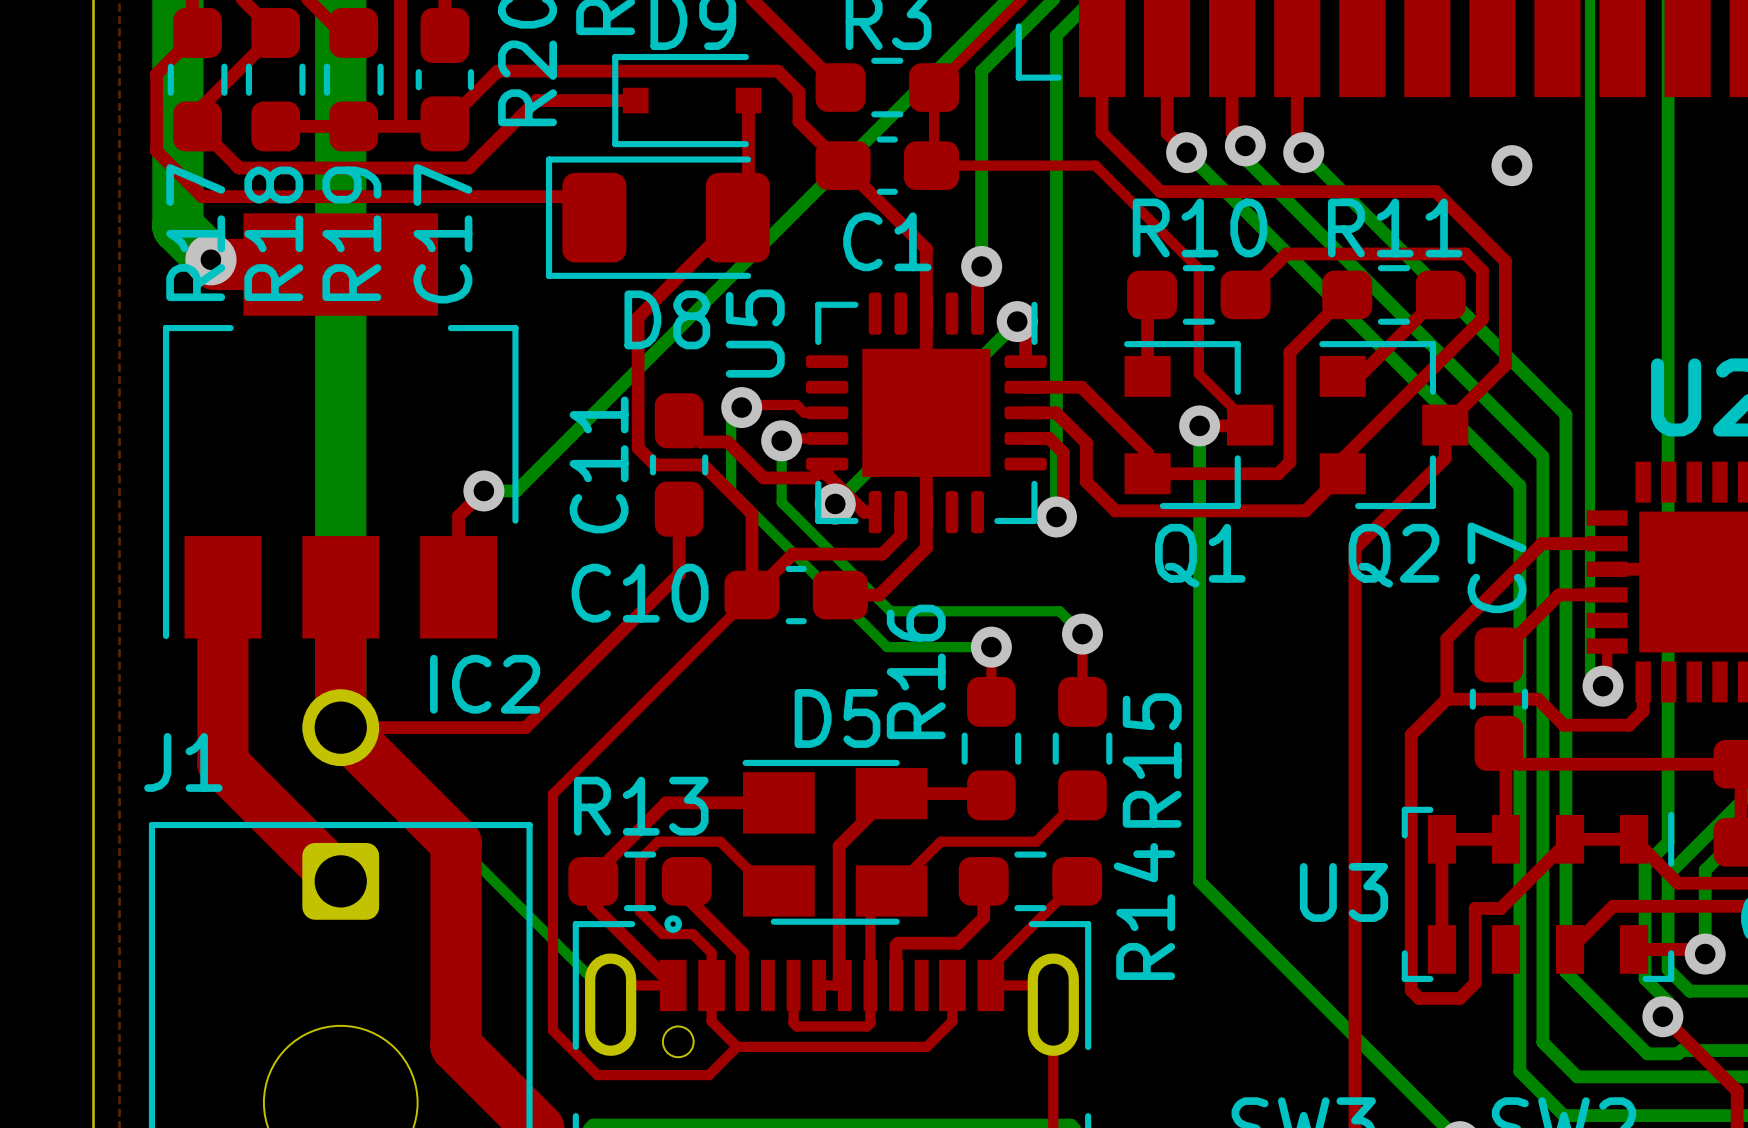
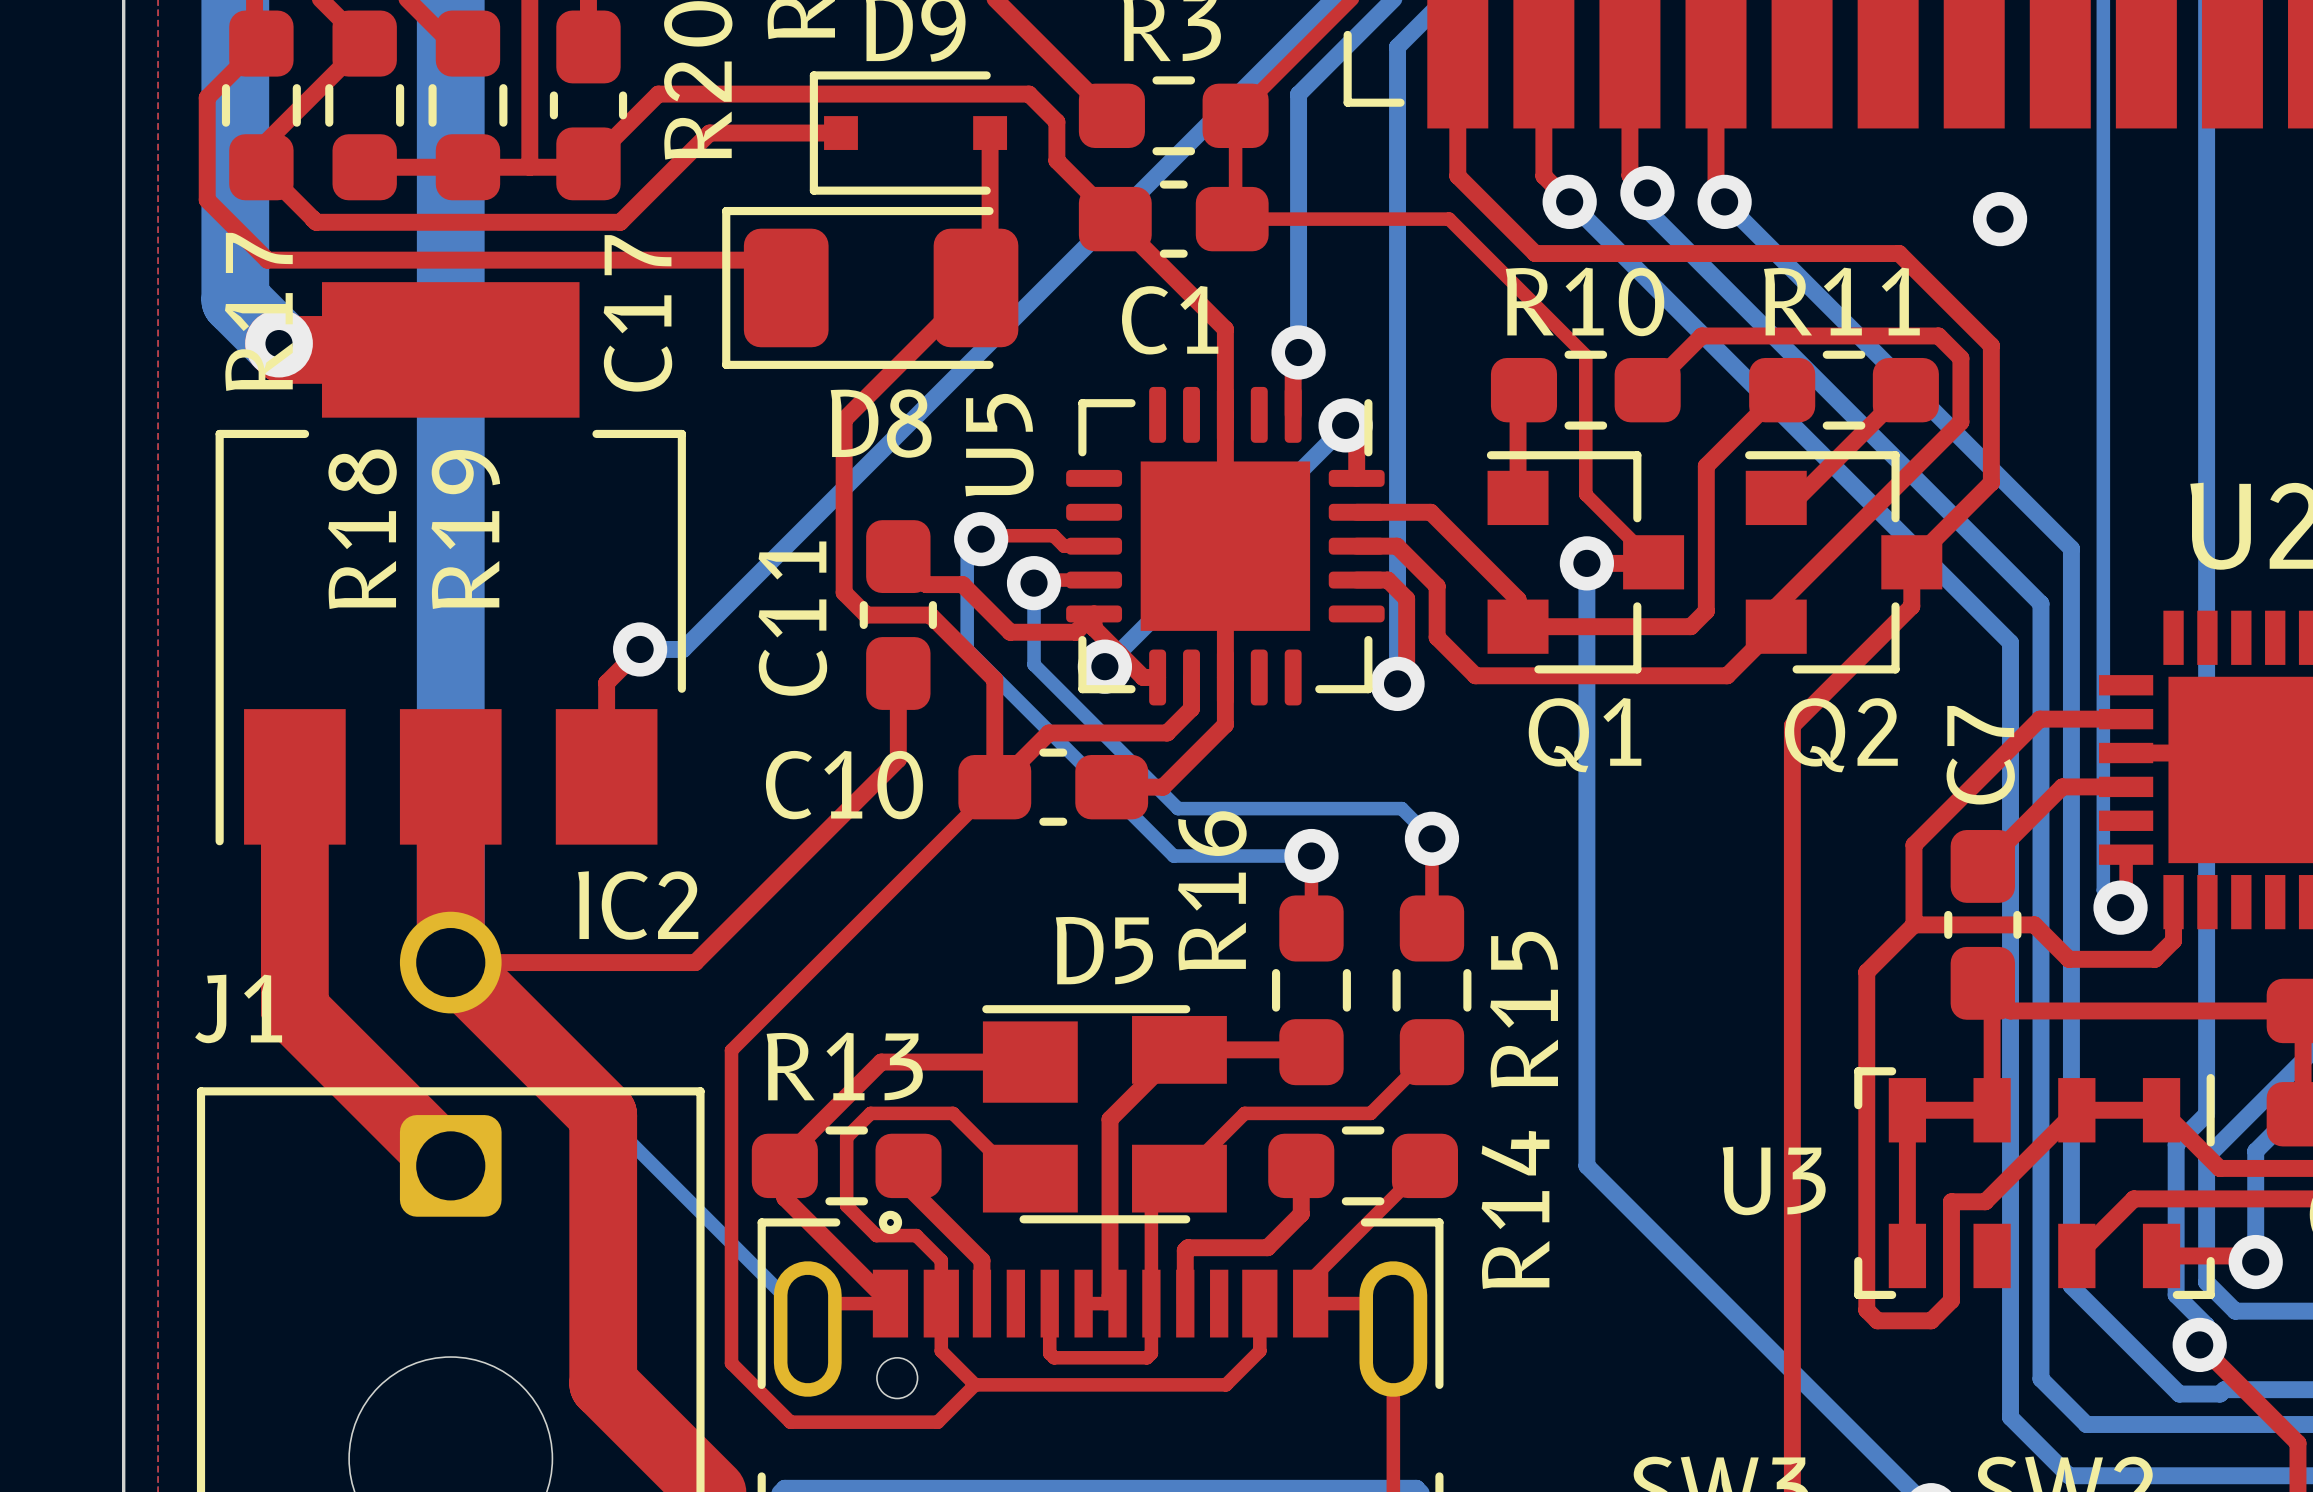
R18 name position: R18 (273, 233) -> R18 (362, 529)
R19 name position: R19 (351, 233) -> R19 (465, 529)
C17 name position: C17 (442, 233) -> C17 (637, 313)

